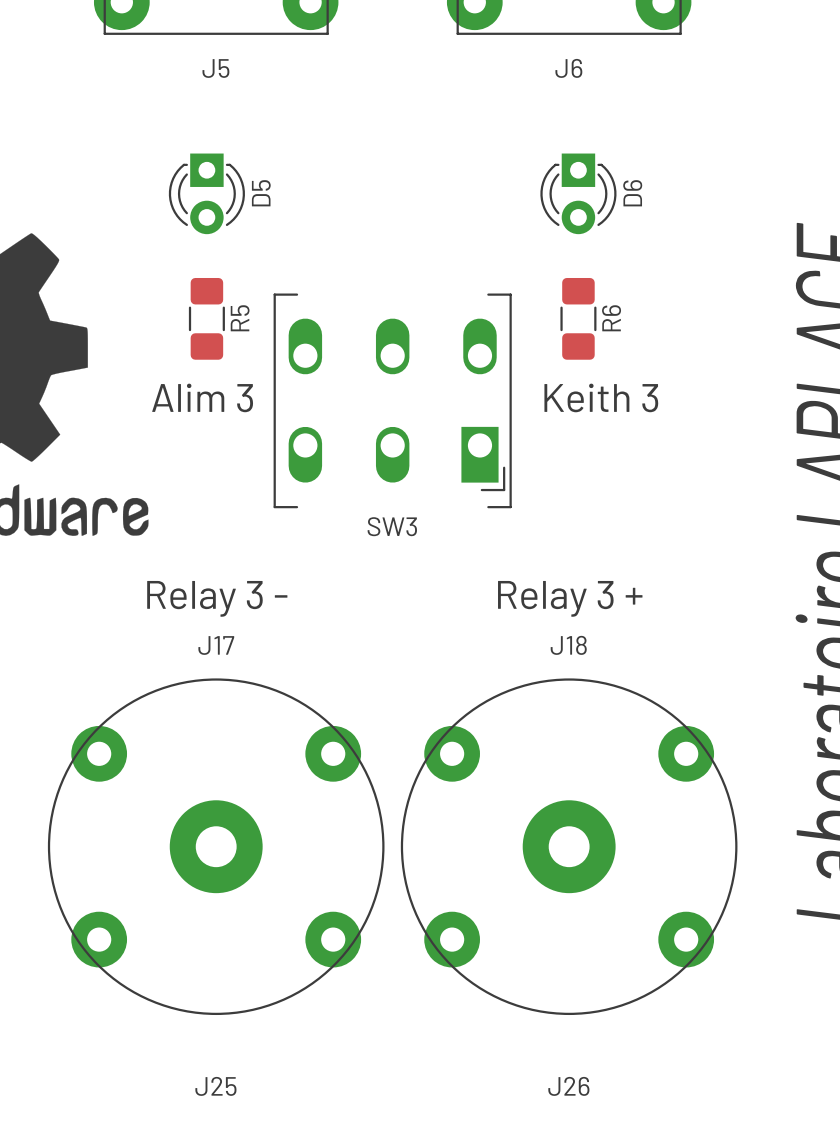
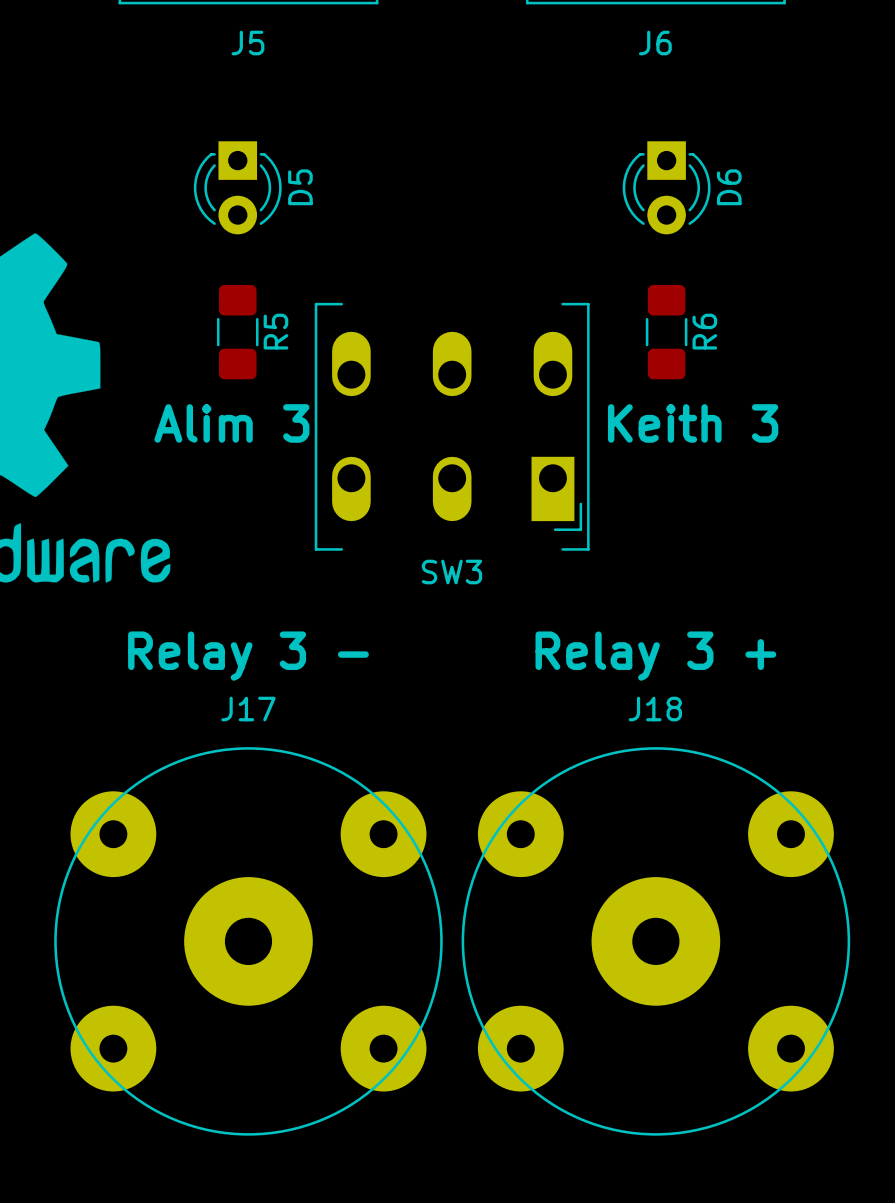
J17 footprint: [47, 678, 385, 1016] -> [54, 747, 443, 1136]
J18 footprint: [400, 678, 738, 1016] -> [461, 747, 851, 1136]

